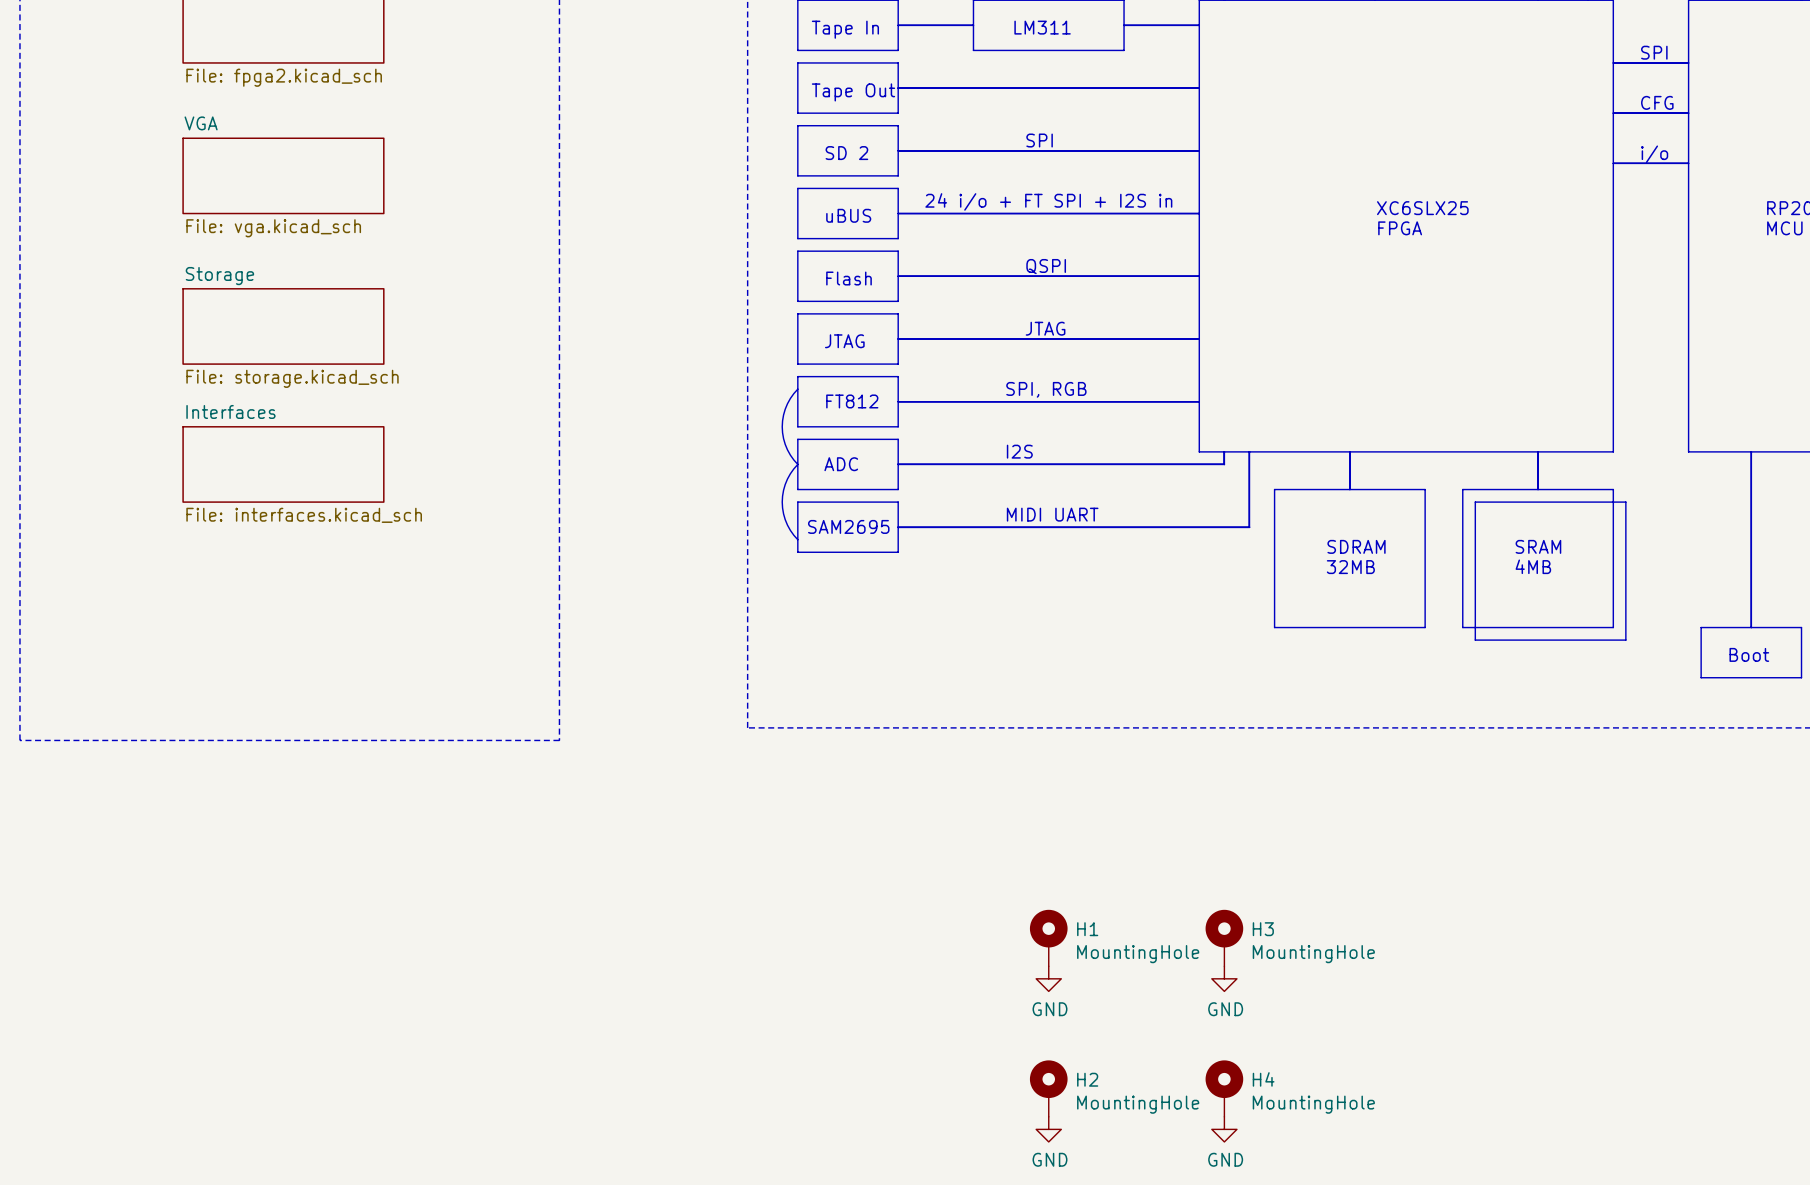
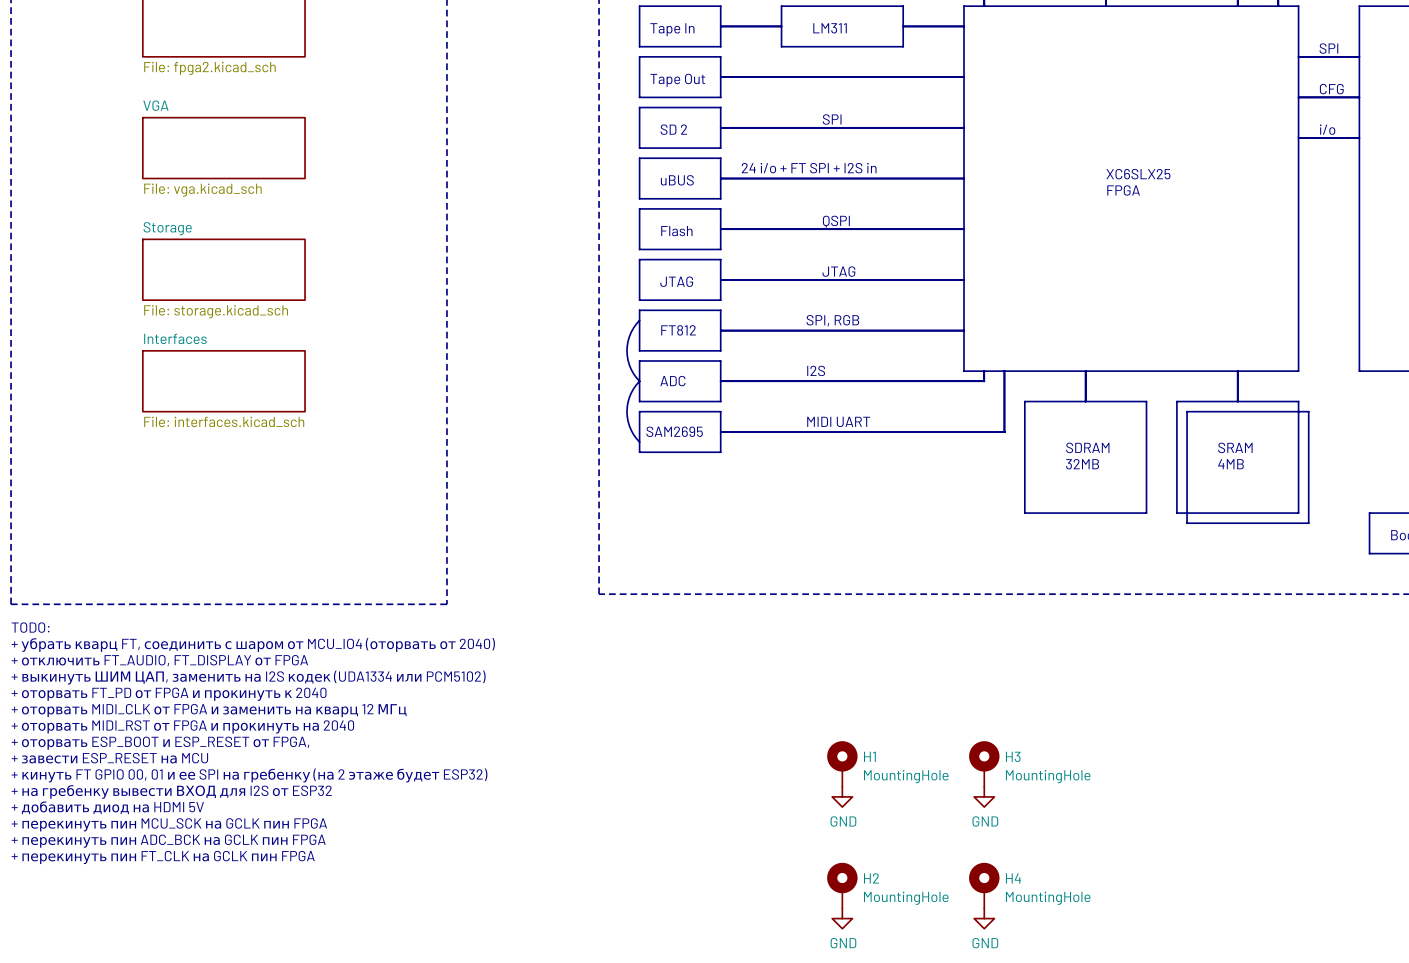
text: none -> TODO: (30, 627)
text: none -> + убрать кварц FT, соединить с шаром от MCU_IO4 (оторвать от 2040) (253, 644)
text: none -> + отключить FT_AUDIO, FT_DISPLAY от FPGA (159, 660)
text: none -> + выкинуть ШИМ ЦАП, заменить на I2S кодек (UDA1334 или PCM5102) (248, 677)
text: none -> + оторвать FT_PD от FPGA и прокинуть к 2040 (169, 694)
text: none -> + оторвать MIDI_CLK от FPGA и заменить на кварц 12 МГц (209, 710)
text: none -> + оторвать MIDI_RST от FPGA и прокинуть на 2040 (182, 726)
text: none -> + оторвать ESP_BOOT и ESP_RESET от FPGA, (160, 743)
text: none -> + завести ESP_RESET на MCU (109, 758)
text: none -> + кинуть FT GPIO 00, 01 и ее SPI на гребенку (на 2 этаже будет ESP32) (249, 775)
text: none -> + на гребенку вывести ВХОД для I2S от ESP32 (171, 791)
text: none -> + добавить диод на HDMI 5V (107, 807)
text: none -> + перекинуть пин MCU_SCK на GCLK пин FPGA (169, 824)
text: none -> + перекинуть пин ADC_BCK на GCLK пин FPGA (168, 841)
text: none -> + перекинуть пин FT_CLK на GCLK пин FPGA (163, 857)

